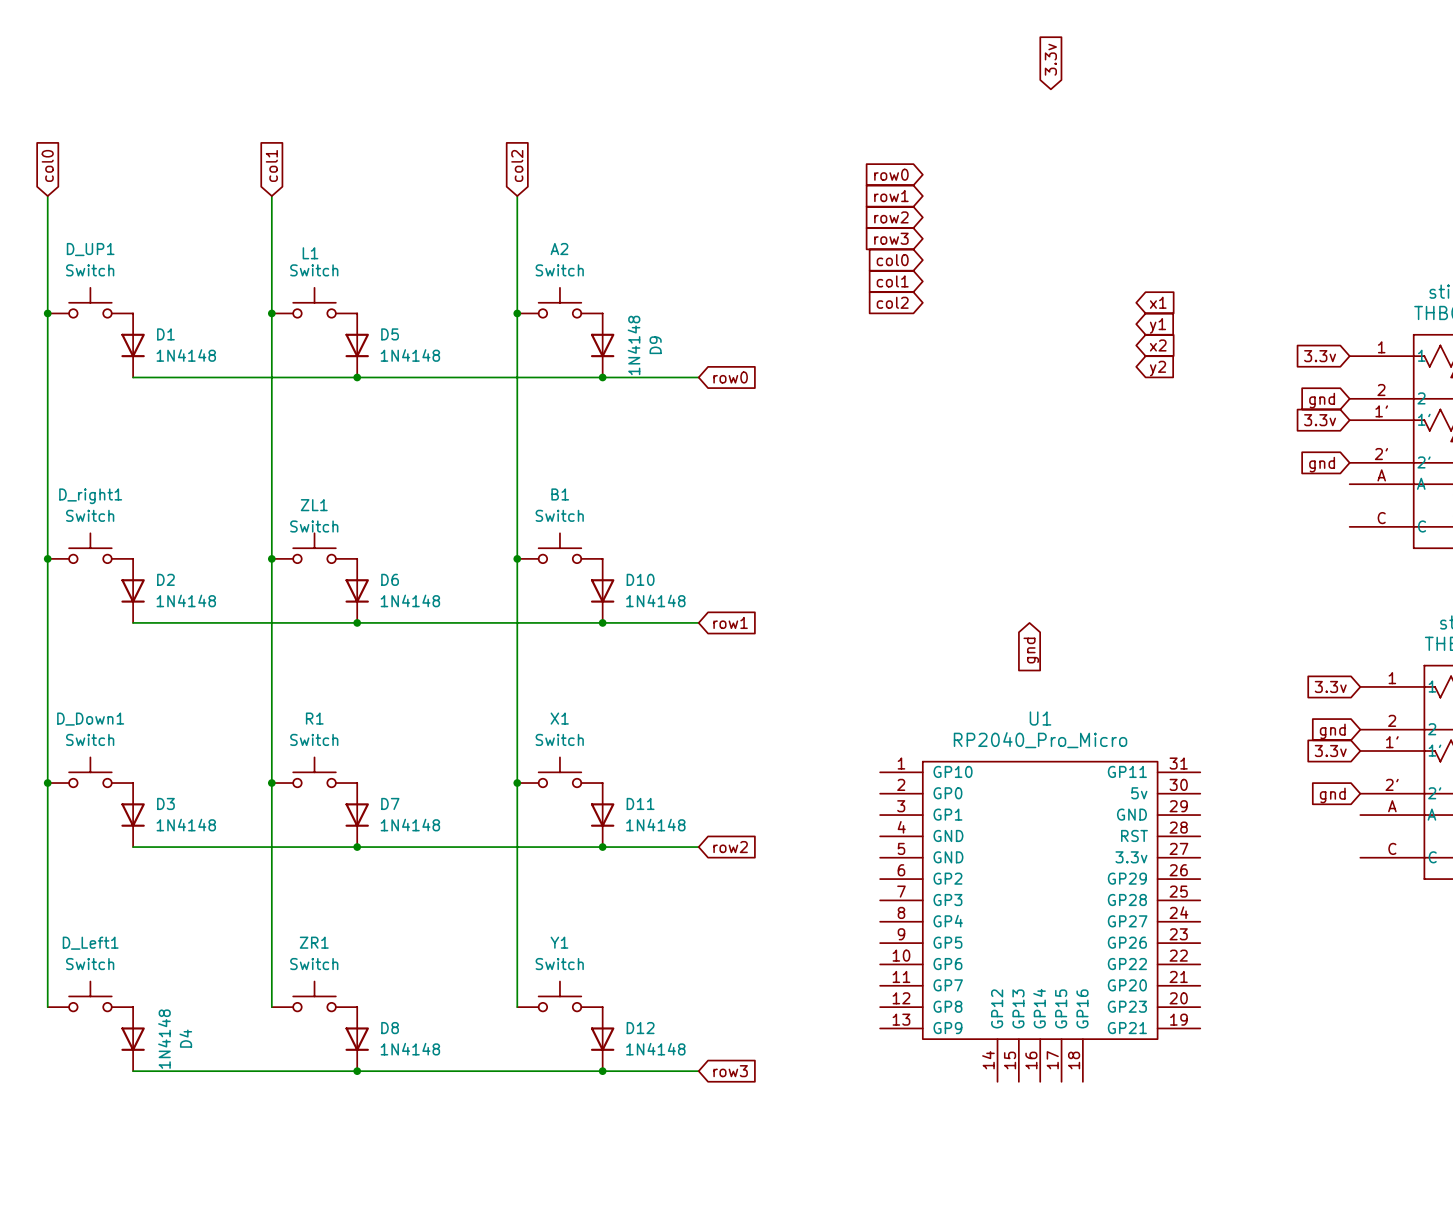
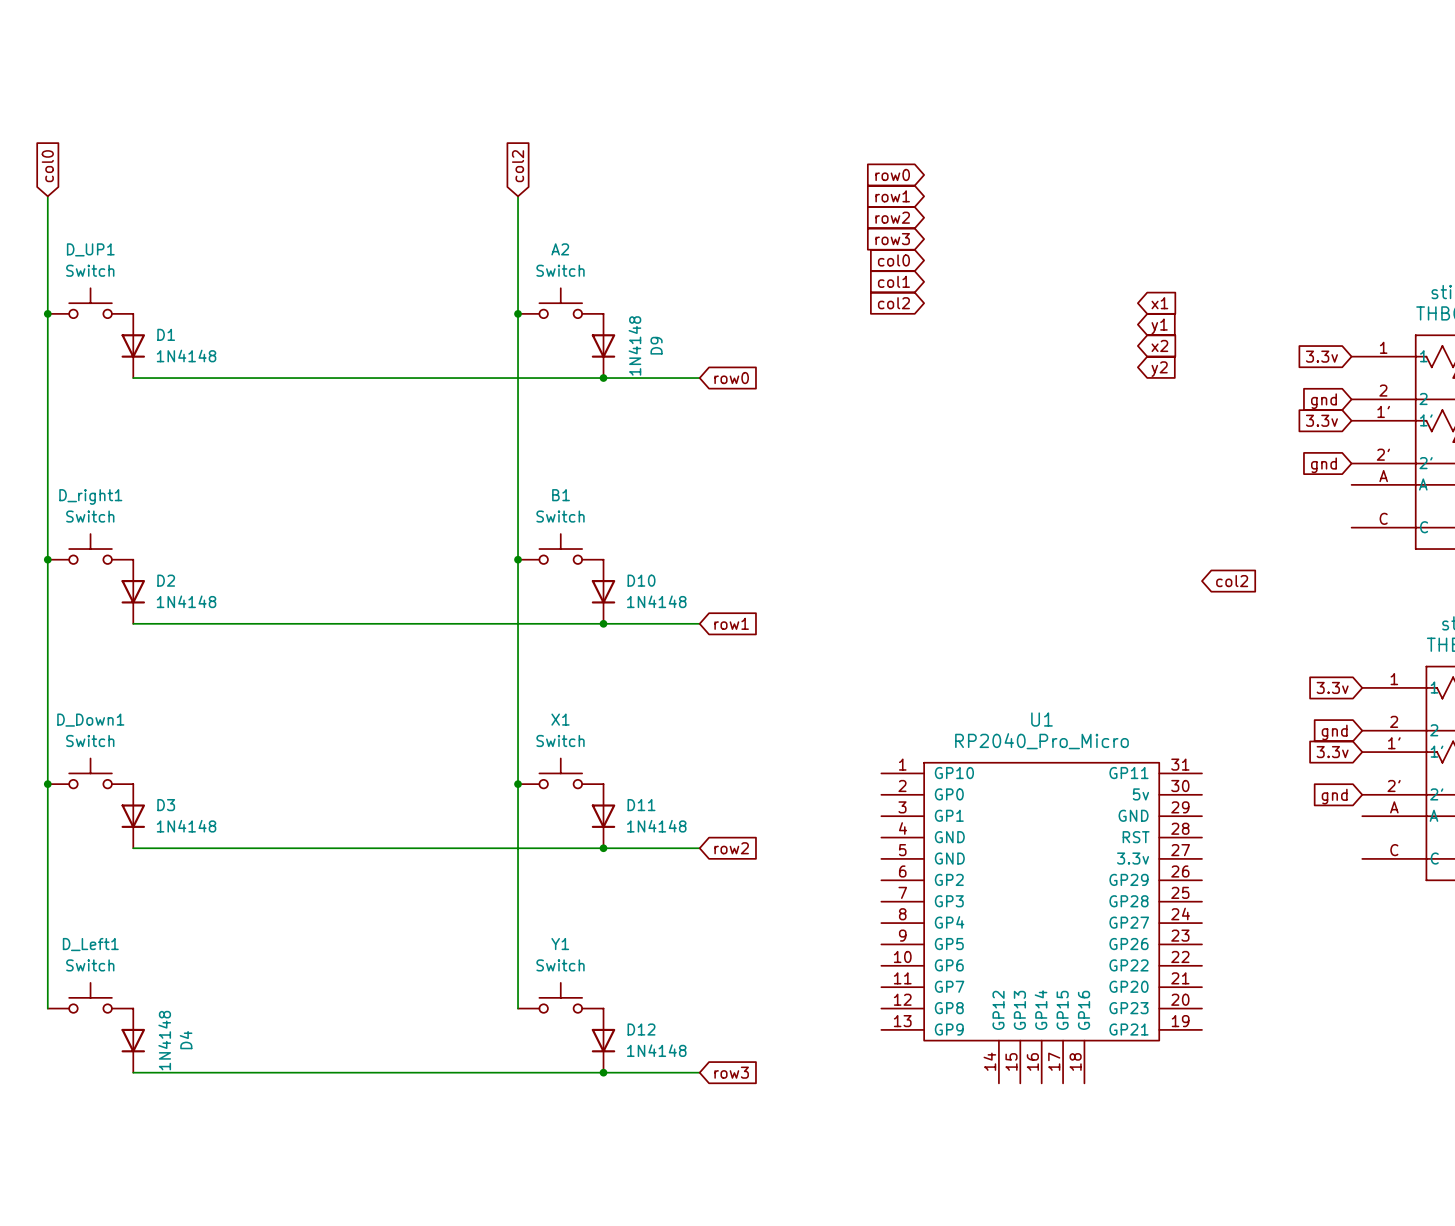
global label: 3.3v (1050, 59) -> none
global label: col1 (271, 165) -> none
wire: (271, 196) (271, 1007) -> none
L1: Switch (314, 302) -> none
junction: (271, 313) -> none
D5: 1N4148 (357, 345) -> none
junction: (357, 377) -> none
ZL1: Switch (314, 548) -> none
junction: (271, 558) -> none
global label: none -> col2 (1232, 581)
D6: 1N4148 (357, 590) -> none
junction: (357, 622) -> none
global label: gnd (1031, 650) -> none
R1: Switch (314, 772) -> none
junction: (271, 783) -> none
D7: 1N4148 (357, 815) -> none
junction: (357, 847) -> none
ZR1: Switch (314, 996) -> none
D8: 1N4148 (357, 1039) -> none
junction: (357, 1071) -> none

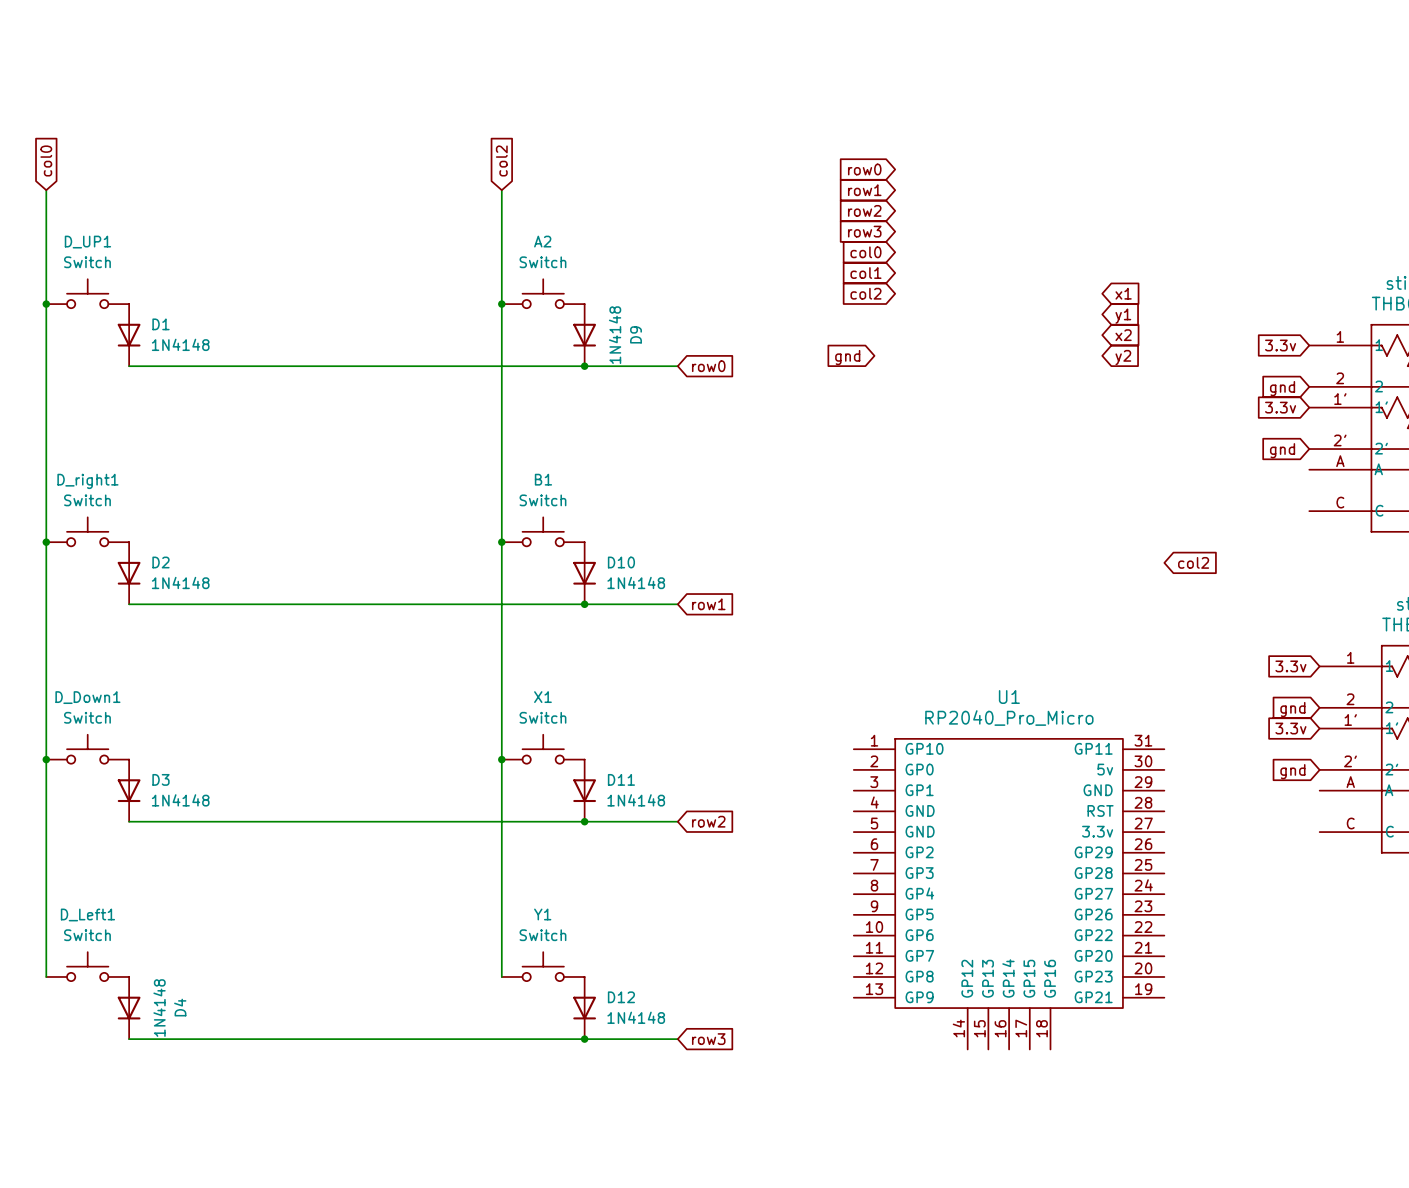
global label: none -> gnd (847, 357)

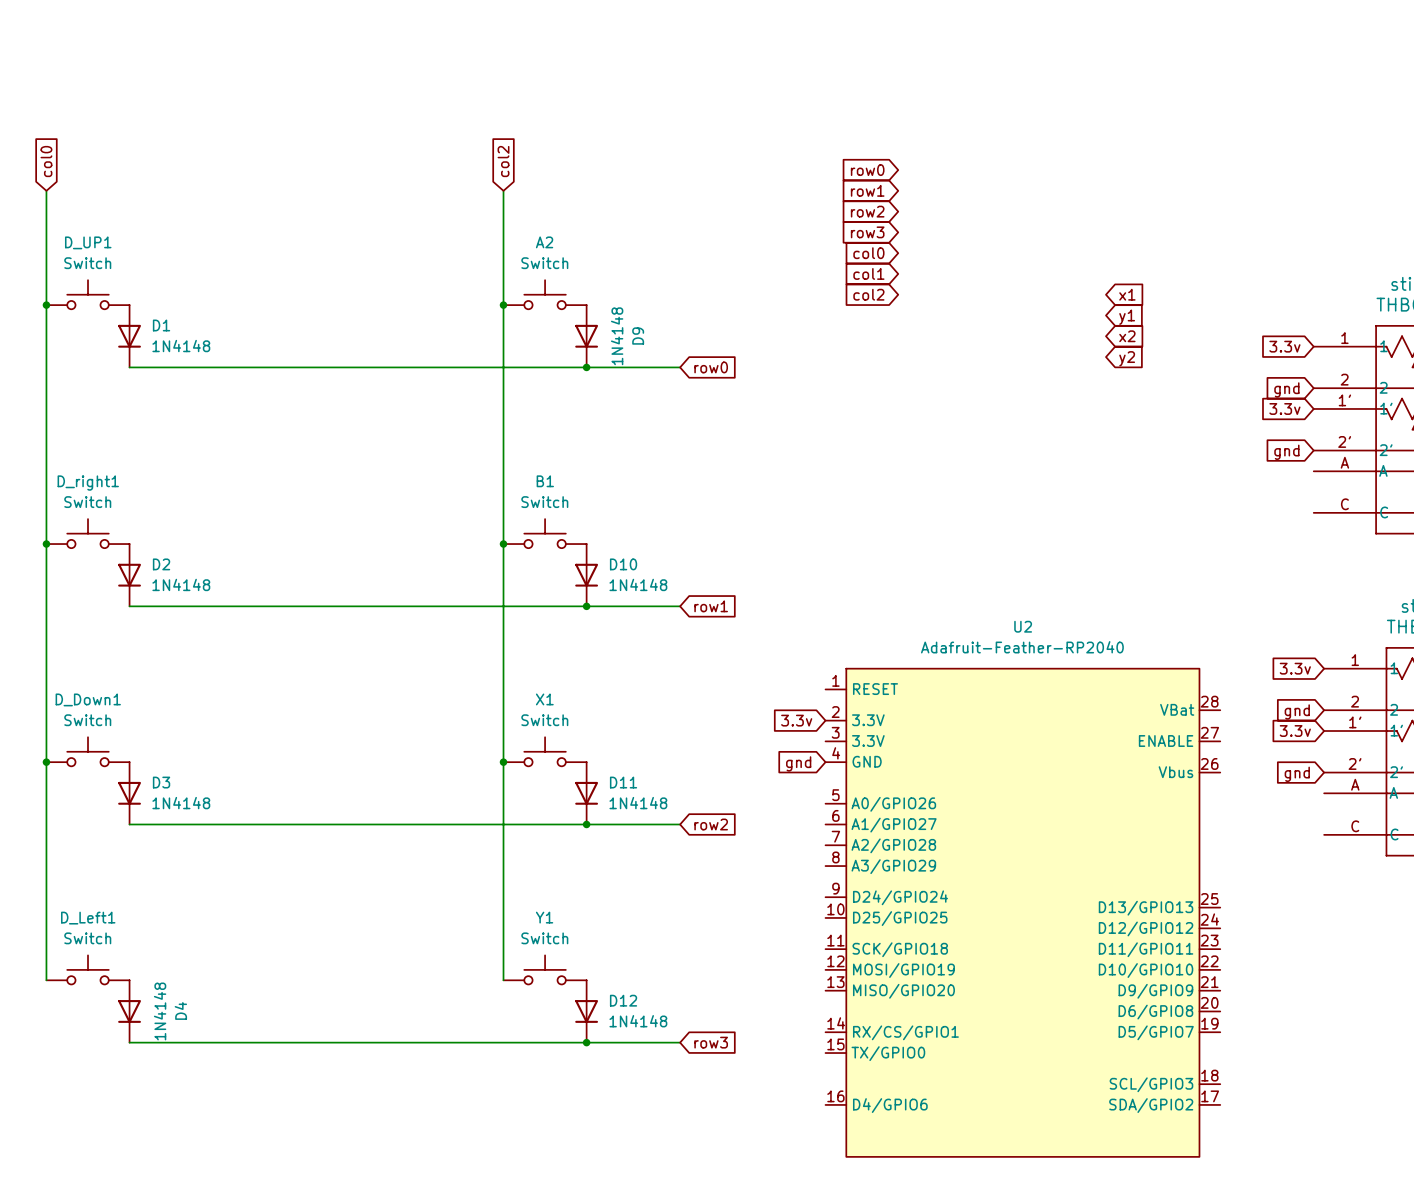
global label: gnd (847, 357) -> none
global label: col2 (1193, 562) -> none
global label: none -> 3.3v (796, 720)
global label: none -> gnd (798, 763)
U1: RP2040_Pro_Micro (1009, 894) -> none
U2: none -> Adafruit-Feather-RP2040 (1022, 912)

